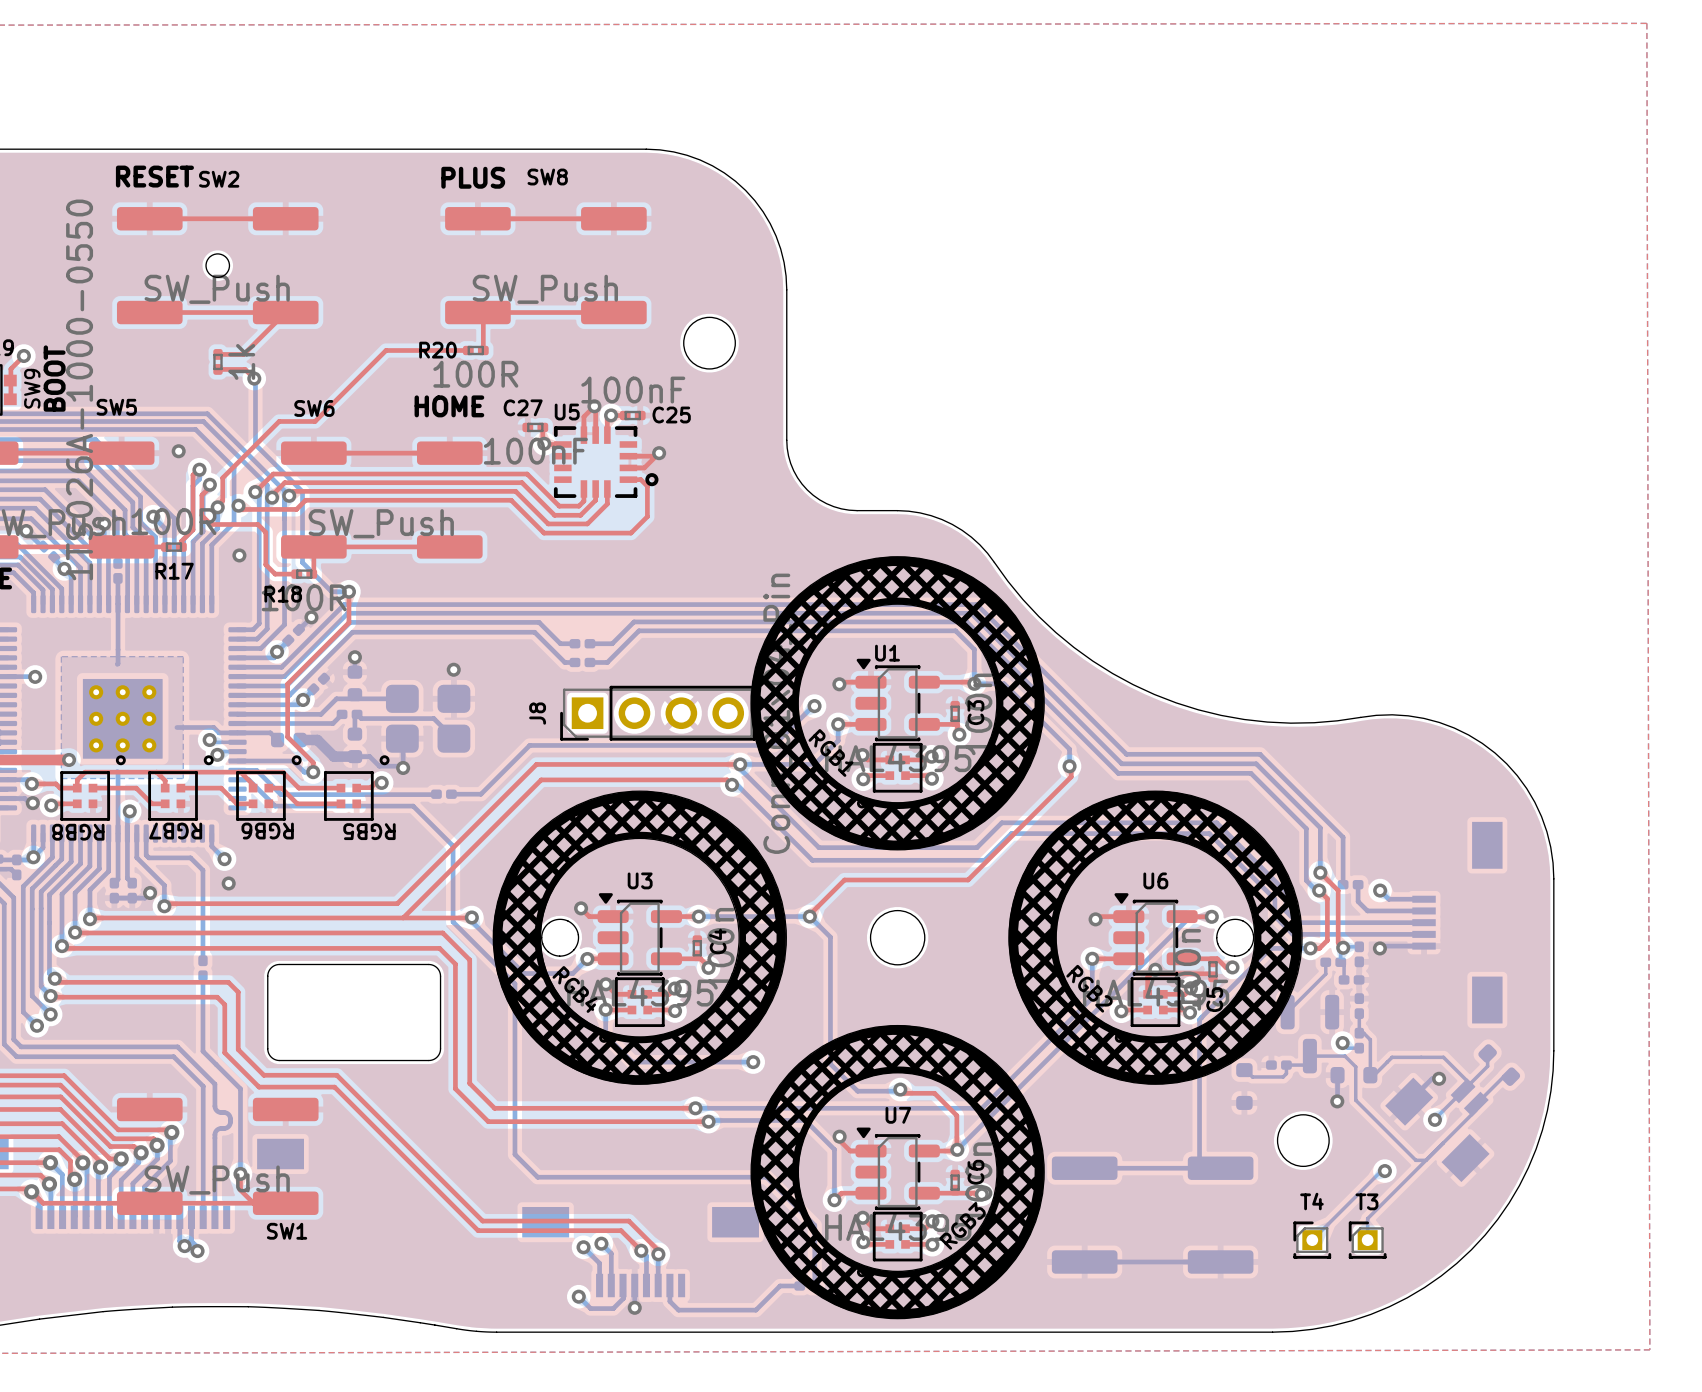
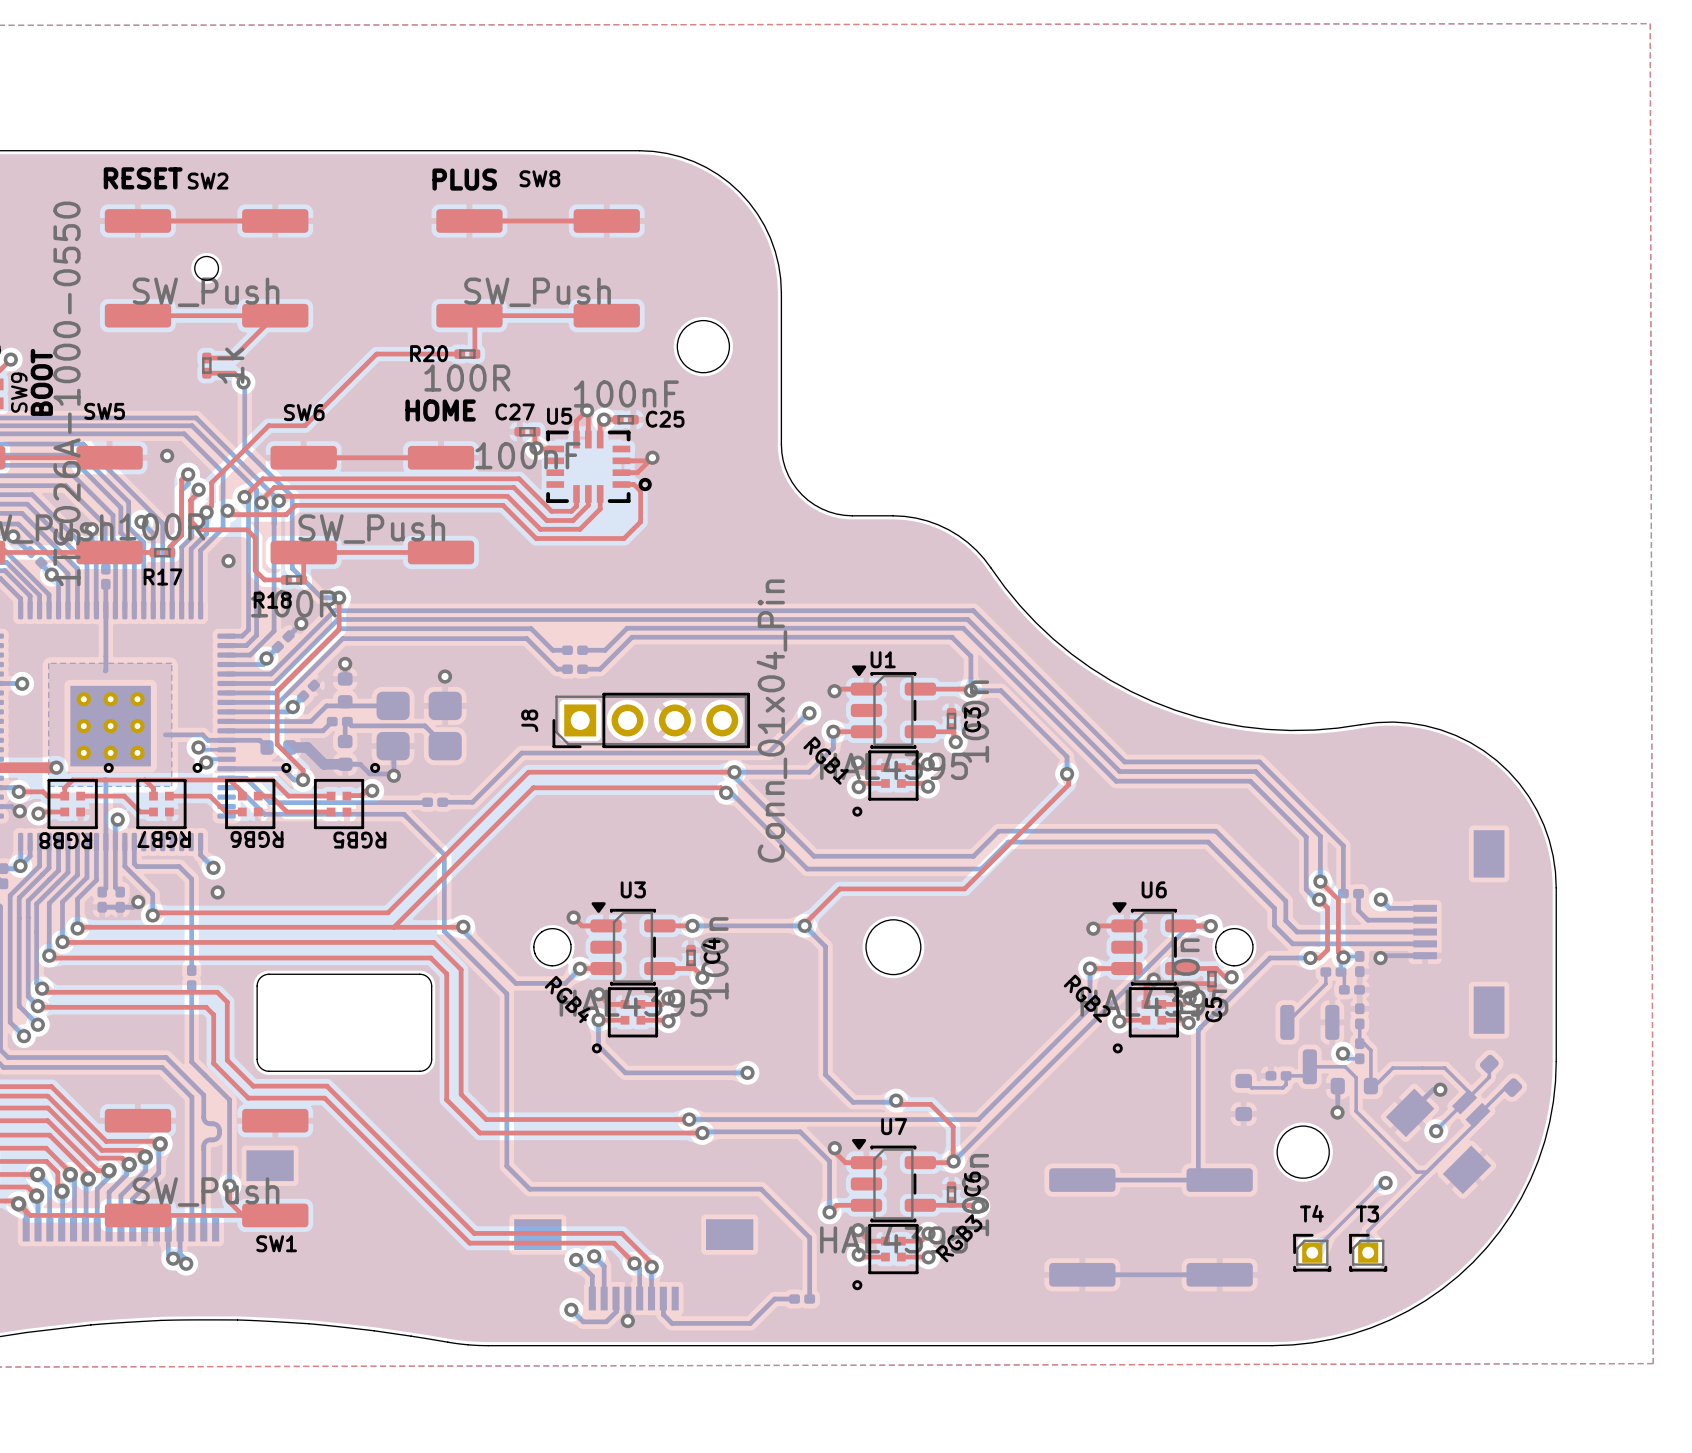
drawing: [492, 556, 1303, 1320] -> none

